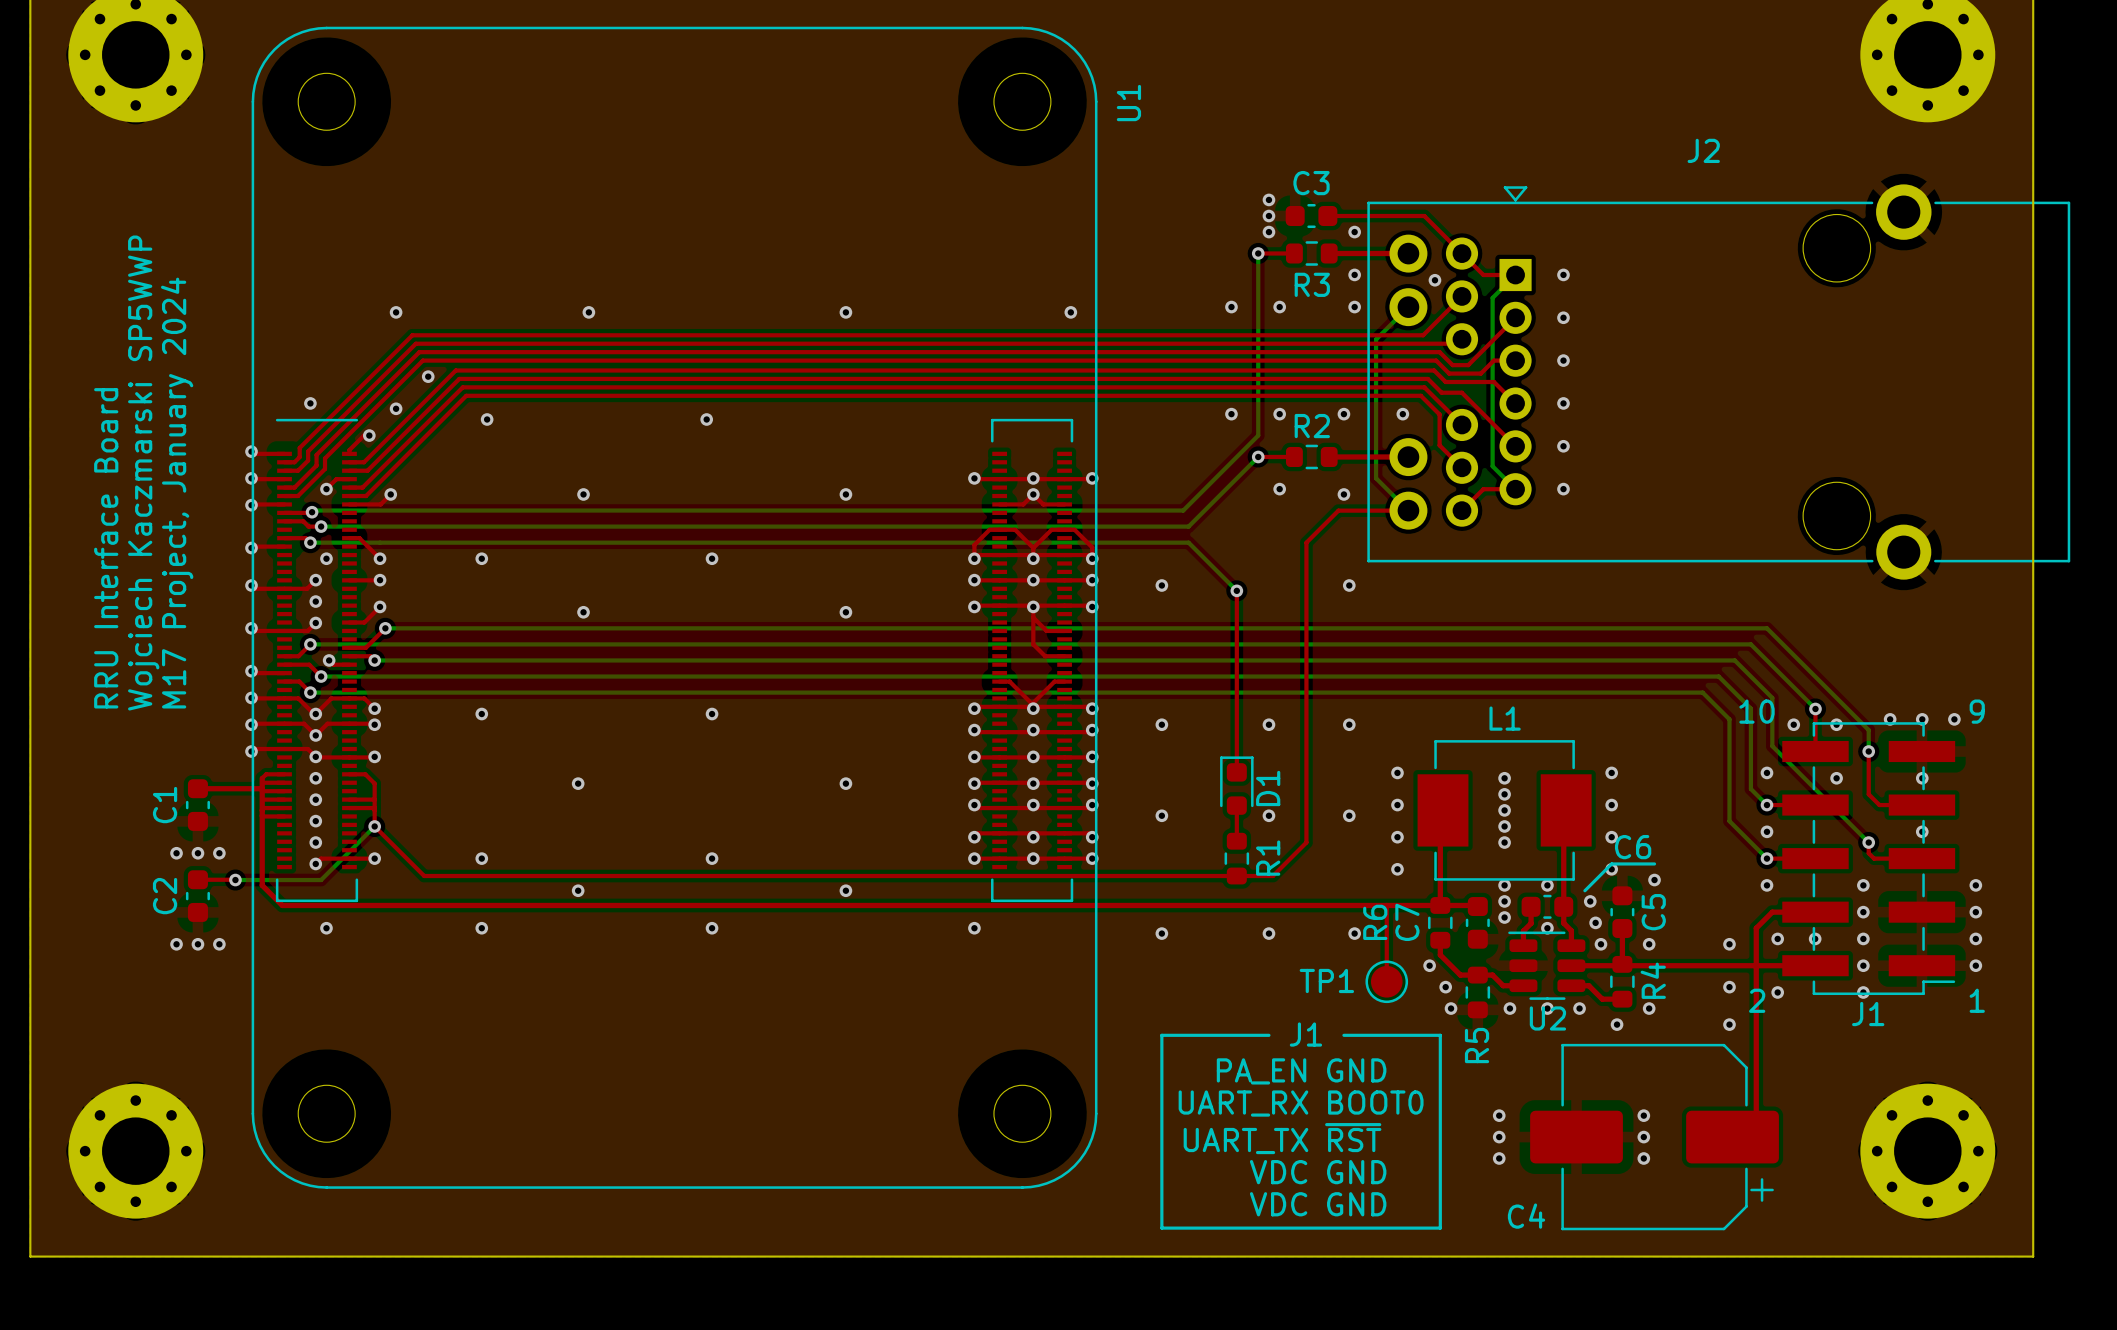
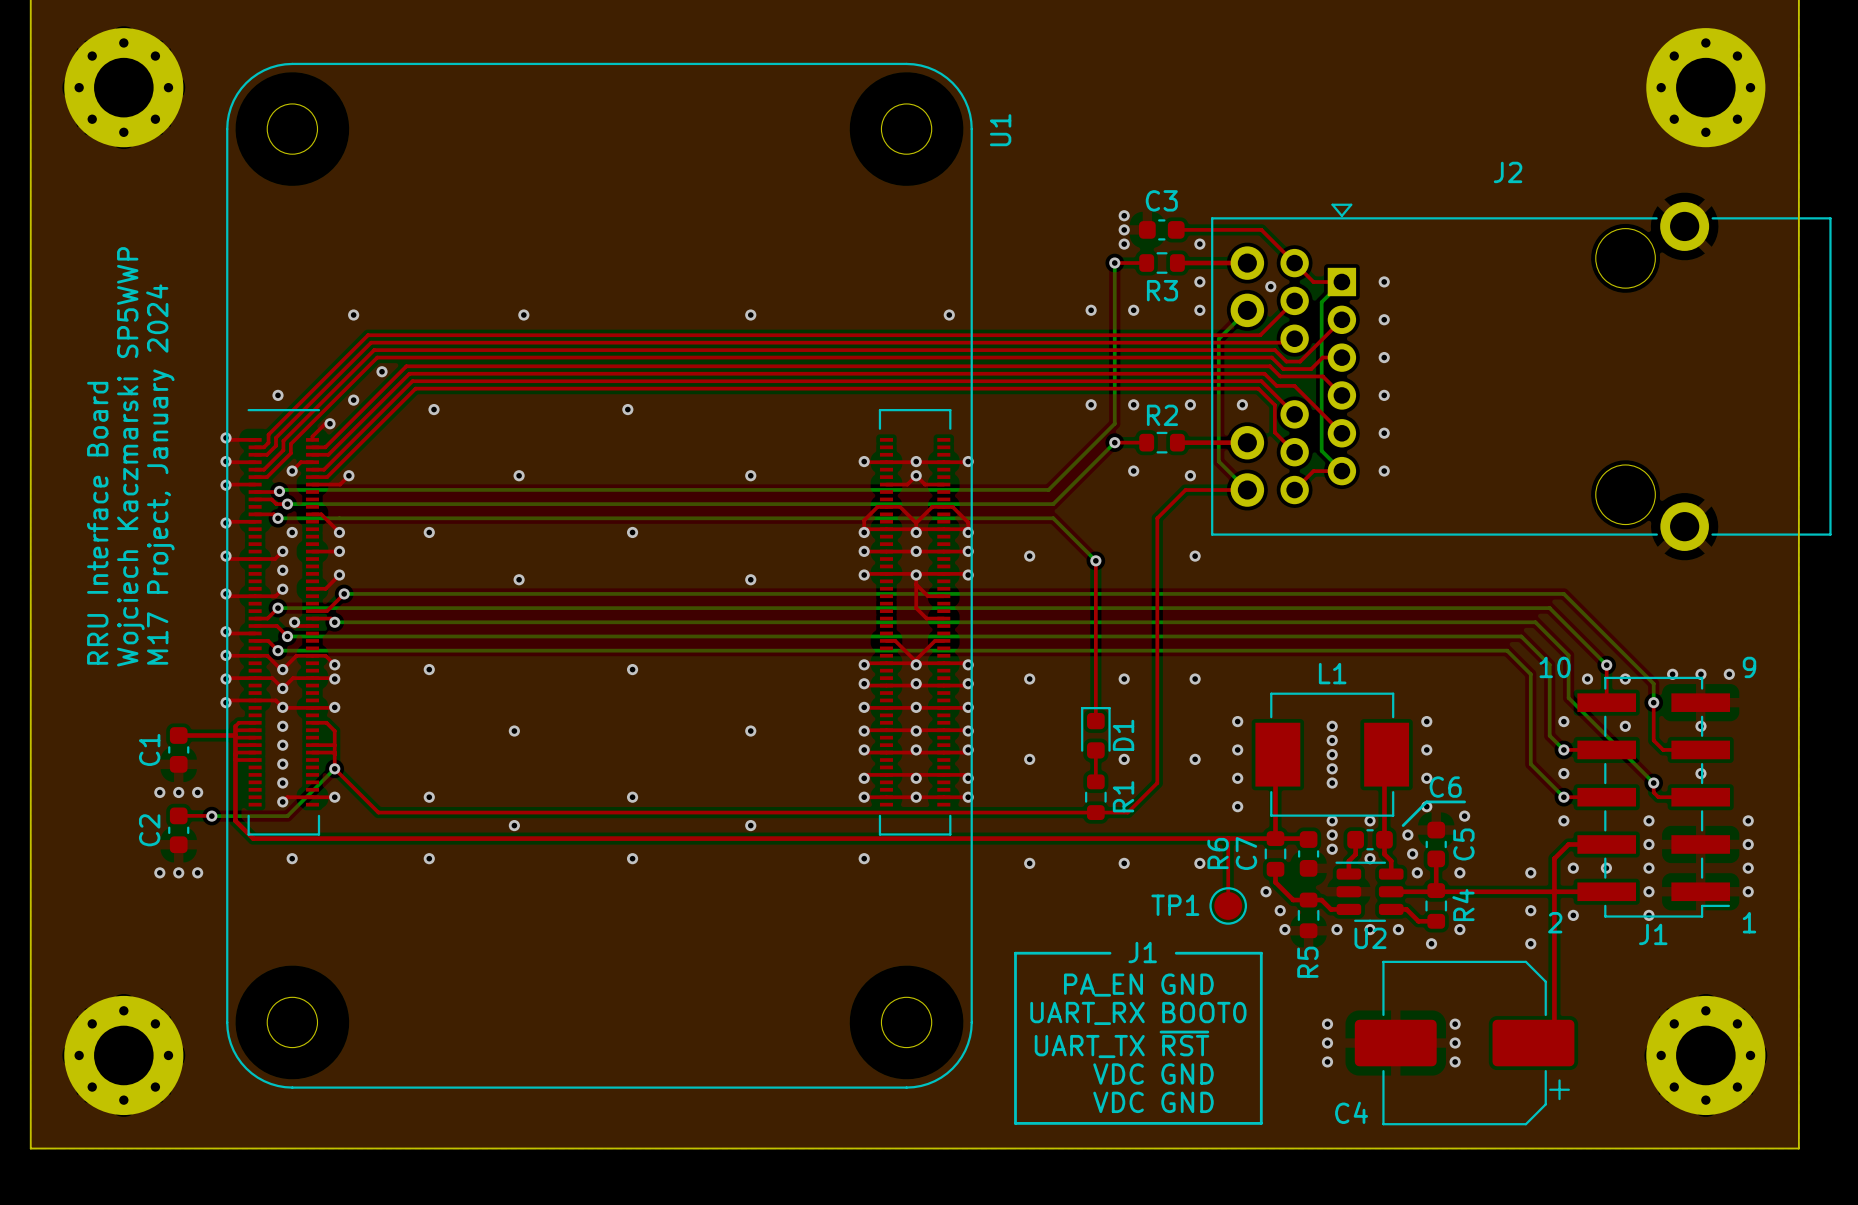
text position: J1 (1305, 1034) -> J1 (1142, 952)
line: (1161, 1035) (1161, 1228) -> (1029, 953) (1015, 953) (1015, 1123) (1029, 1123)
line: (1252, 1035) (1268, 1035) -> (1176, 953) (1190, 953)
line: (1424, 1035) (1440, 1035) (1440, 1228) (1424, 1228) -> (1261, 953) (1261, 1123)
text position: GND (1356, 1070) -> GND (1187, 984)
text position: PA_EN (1261, 1071) -> PA_EN (1103, 985)
text position: BOOT0 (1375, 1102) -> BOOT0 (1204, 1012)
text position: UART_RX (1243, 1103) -> UART_RX (1087, 1013)
text position: ~{RST} (1353, 1137) -> ~{RST} (1184, 1043)
text position: UART_TX (1245, 1141) -> UART_TX (1089, 1046)
text position: VDC (1278, 1172) -> VDC (1118, 1074)
text position: GND (1356, 1172) -> GND (1187, 1074)
text position: VDC (1278, 1204) -> VDC (1118, 1102)
text position: GND (1356, 1204) -> GND (1187, 1102)

